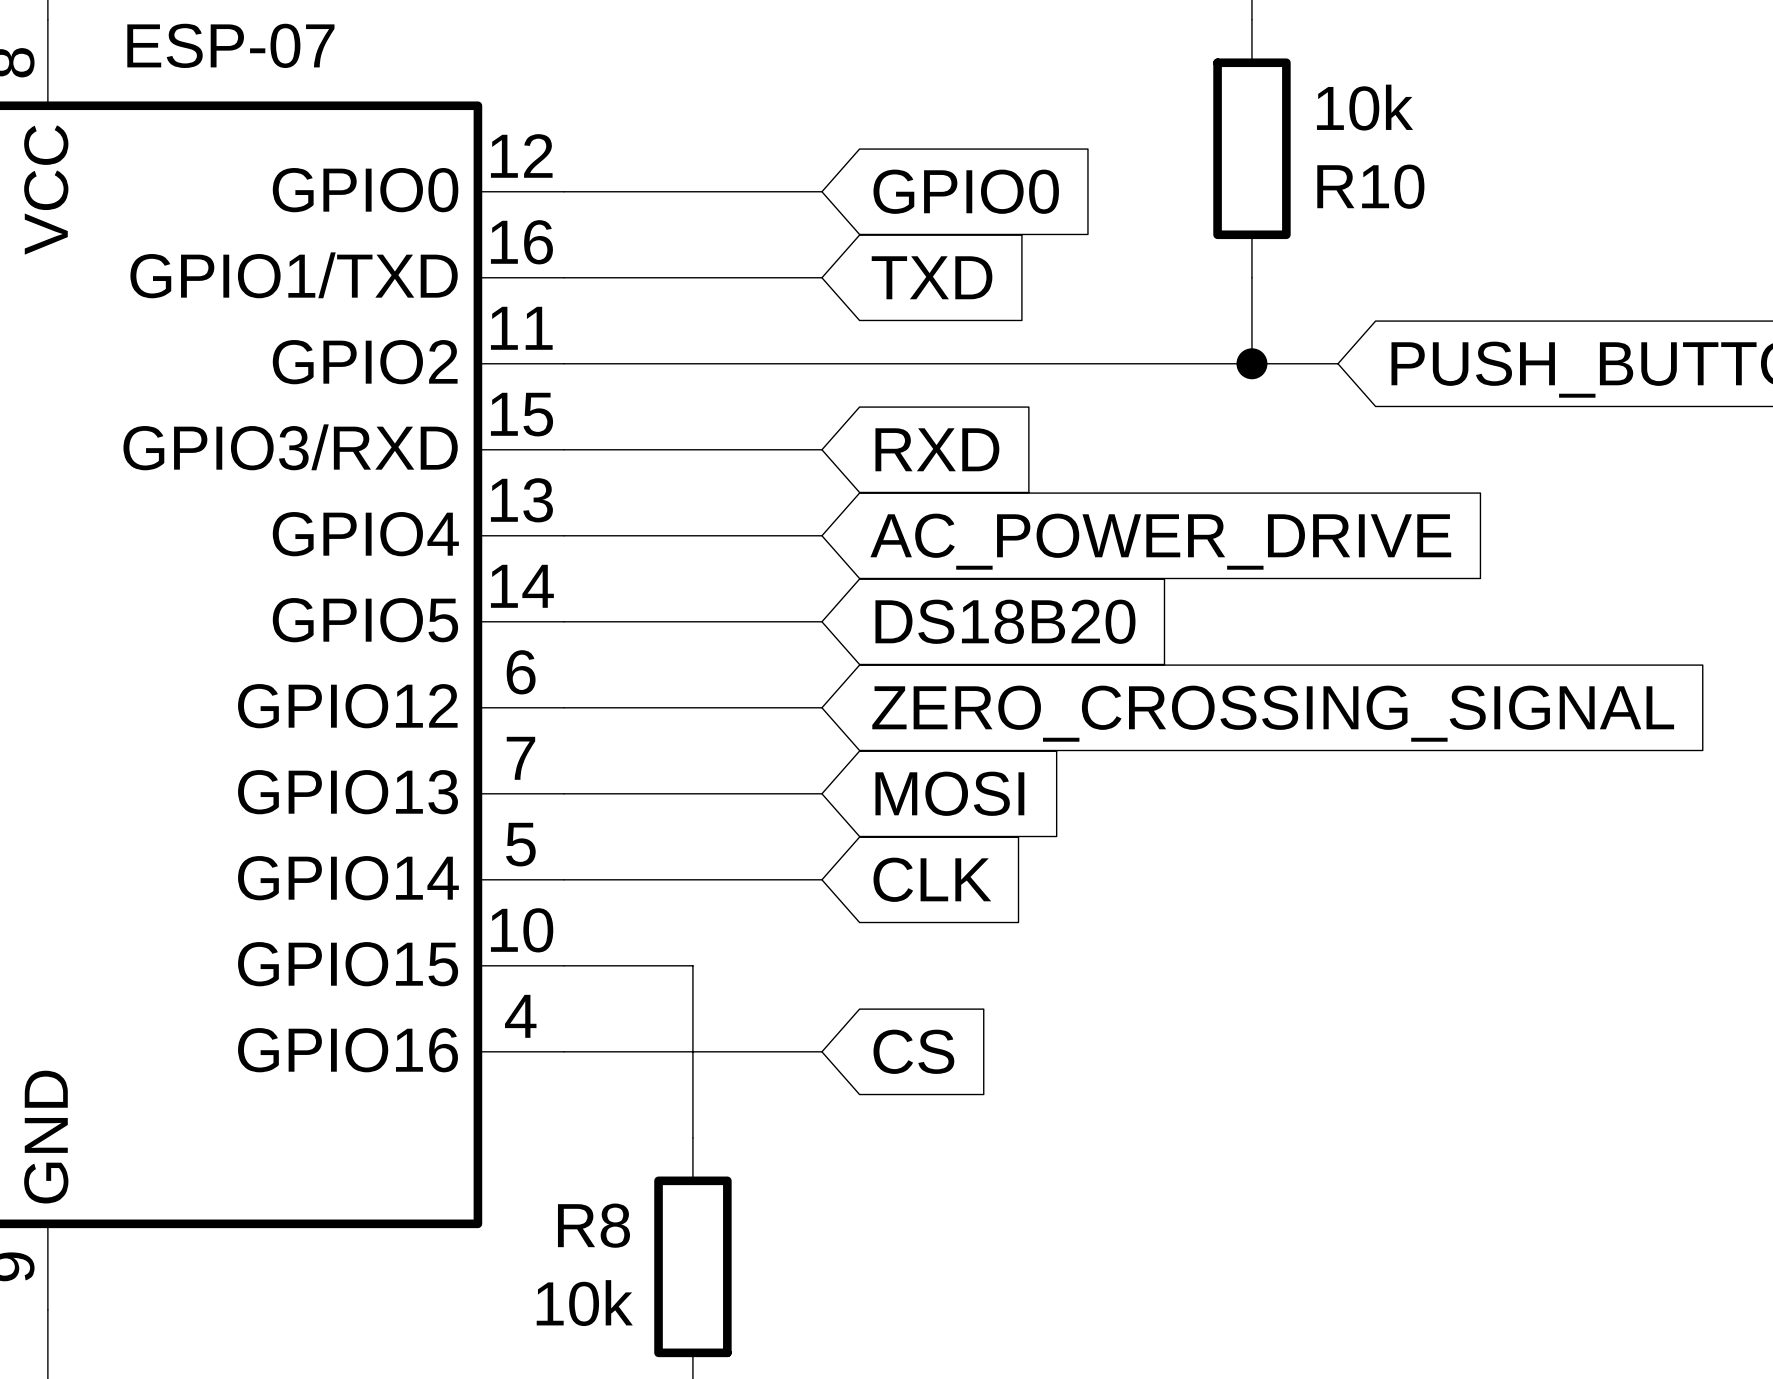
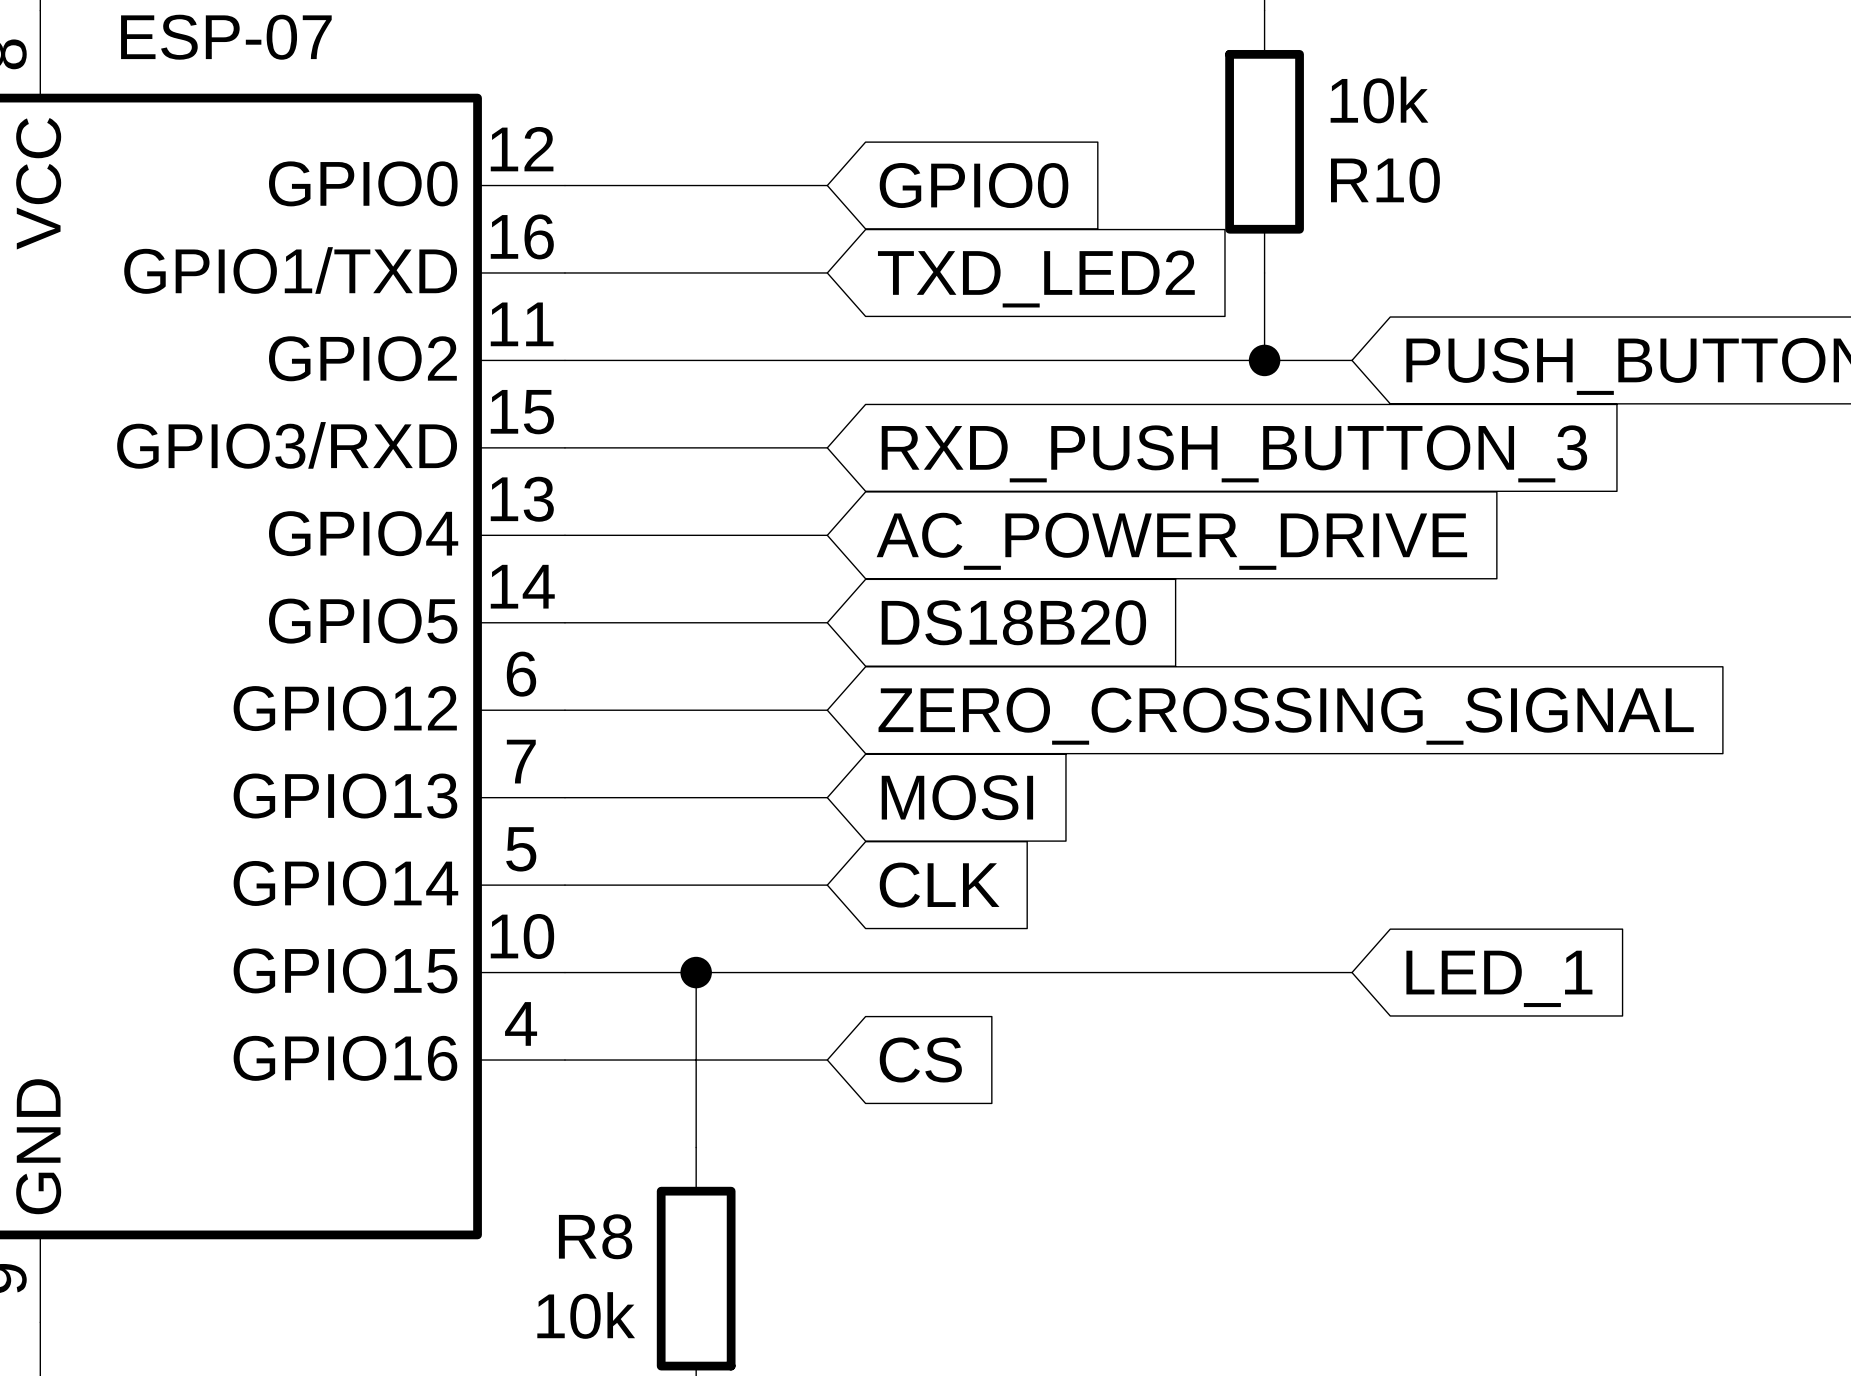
global label: TXD (932, 277) -> TXD_LED2 (1036, 278)
global label: RXD (937, 449) -> RXD_PUSH_BUTTON_3 (1234, 453)
wire: none -> (696, 972) (1352, 972)
junction: none -> (696, 972)
global label: none -> LED_1 (1499, 978)

